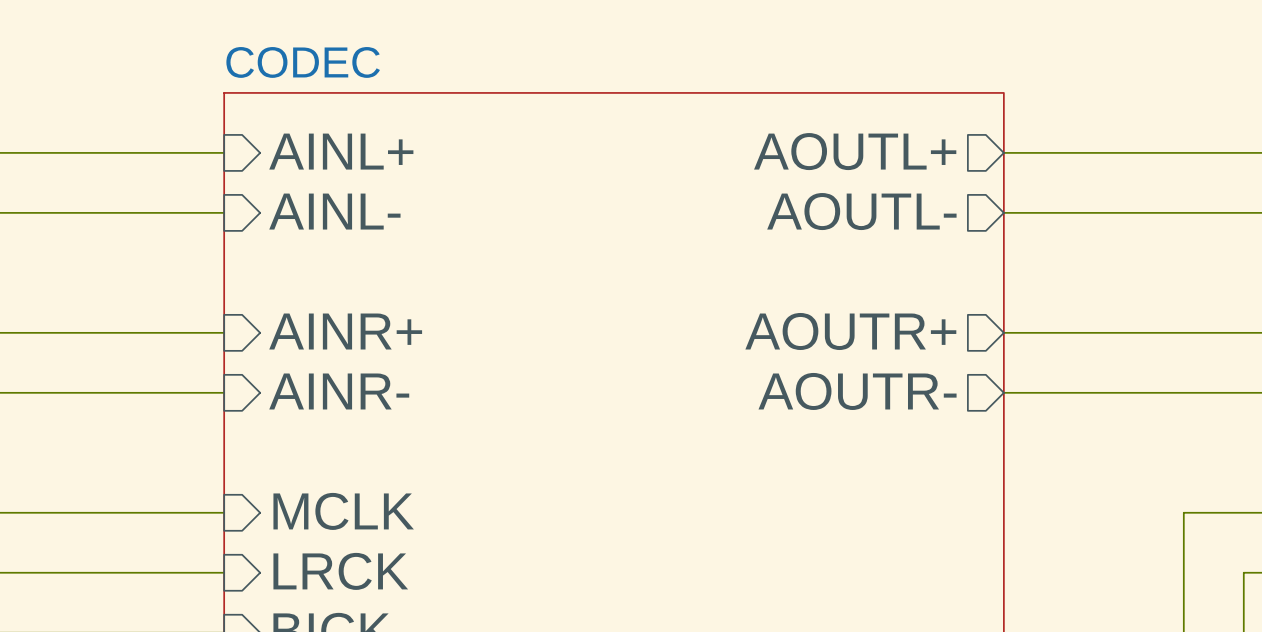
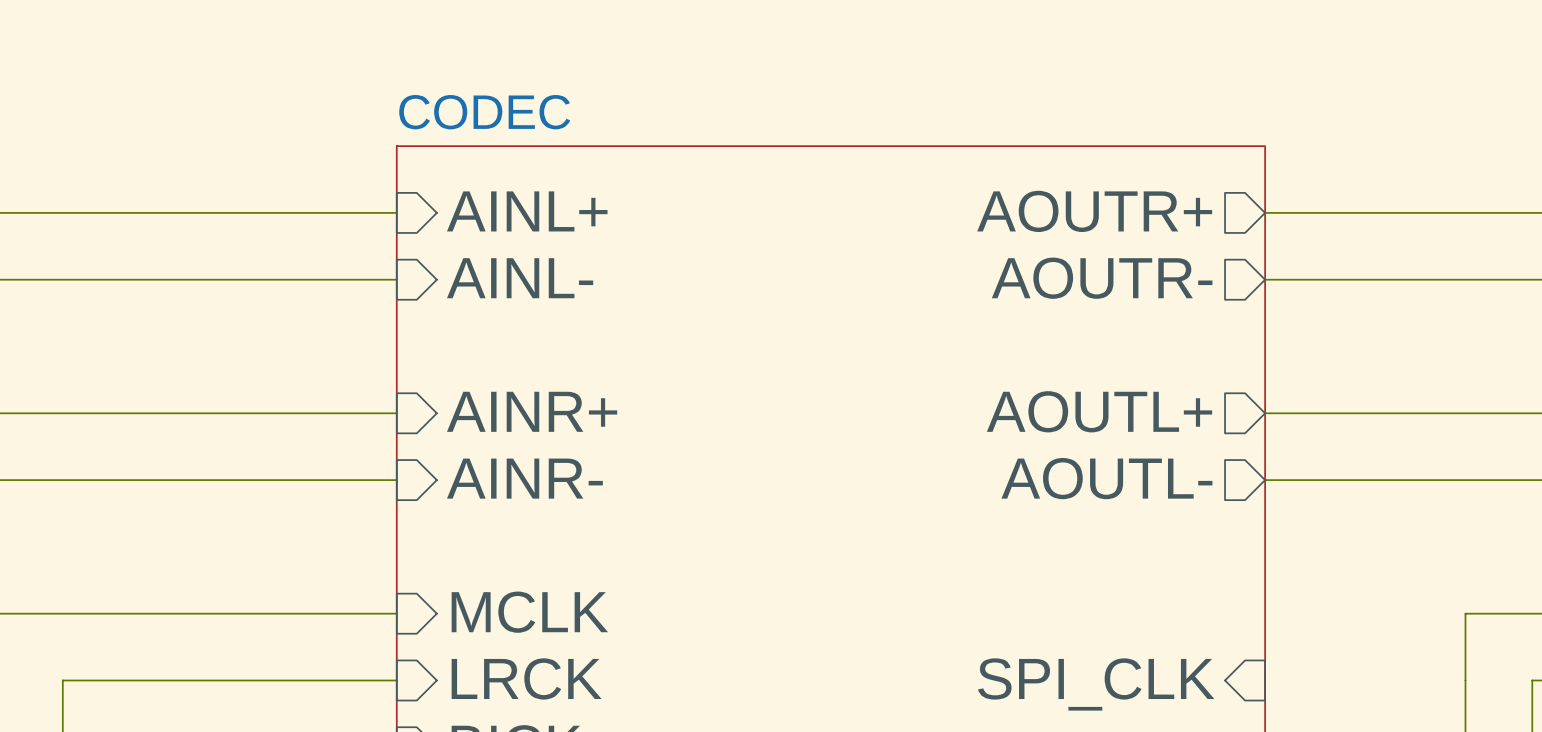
sheet pin: AOUTL+ (855, 151) -> AOUTR+ (1094, 211)
sheet pin: AOUTL- (861, 211) -> AOUTR- (1102, 278)
sheet pin: AOUTR+ (850, 331) -> AOUTL+ (1099, 411)
sheet pin: AOUTR- (857, 391) -> AOUTL- (1106, 478)
sheet pin: none -> SPI_CLK (1096, 684)

